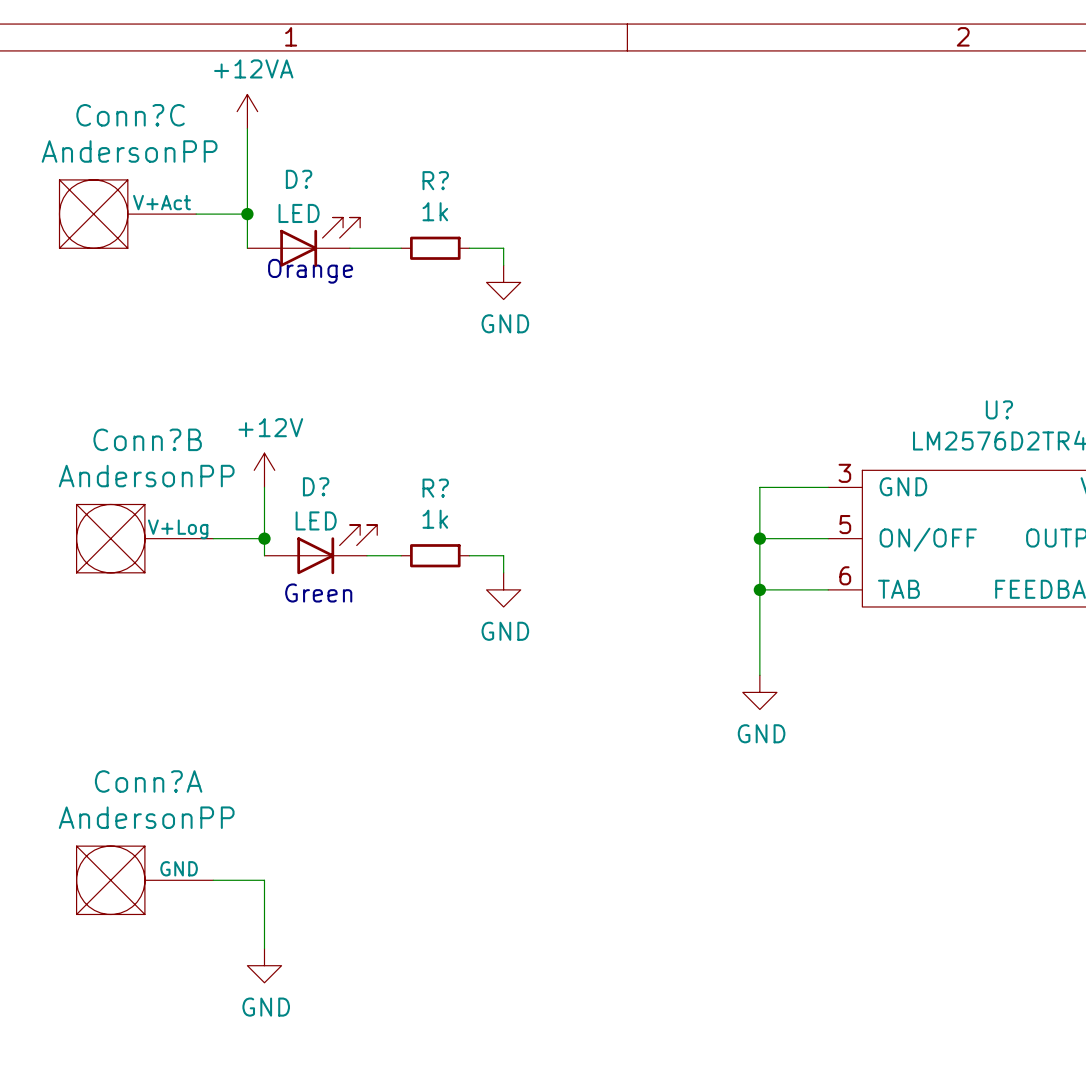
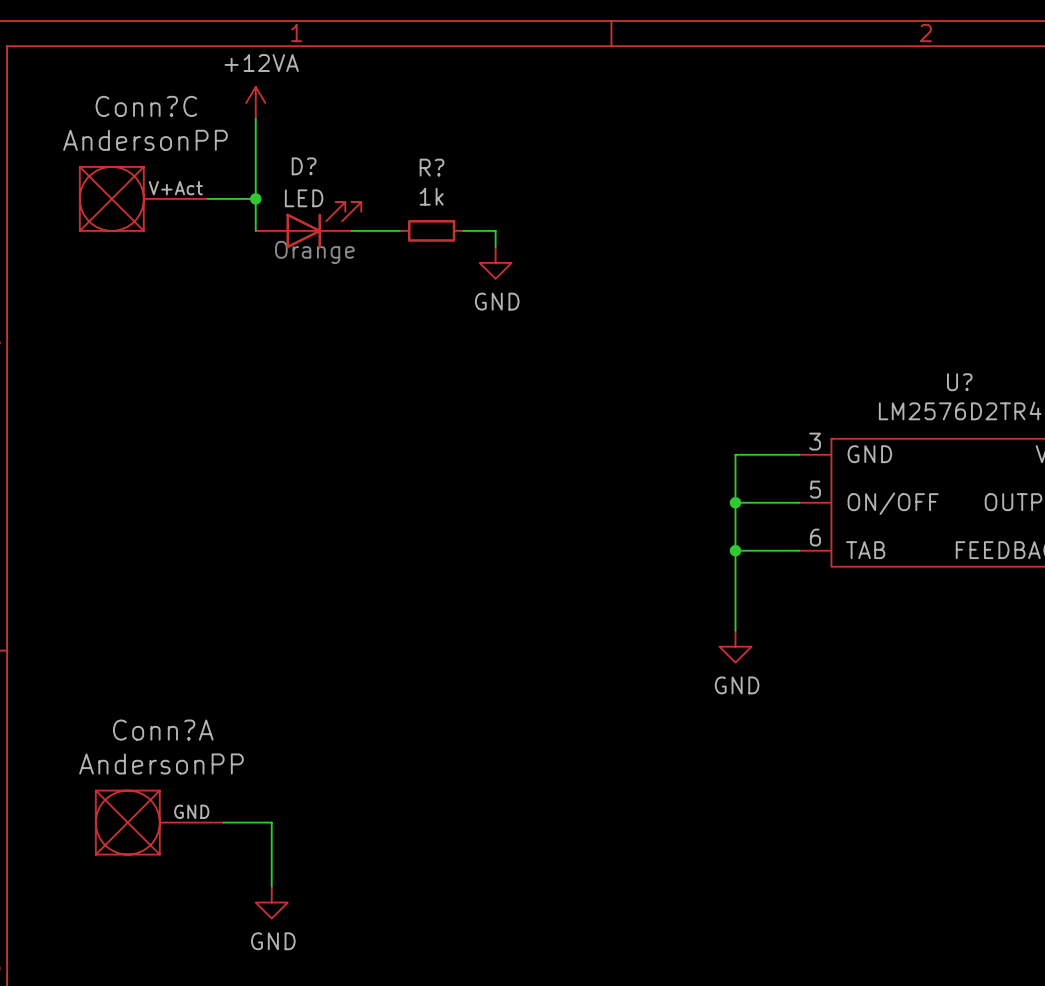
power symbol: +12V (264, 470) -> none
wire: (264, 487) (264, 555) -> none
Conn?B: AndersonPP (144, 538) -> none
wire: (213, 538) (264, 538) -> none
junction: (264, 538) -> none
D?: LED (320, 549) -> none
wire: (366, 555) (401, 555) -> none
R?: 1k (435, 555) -> none
wire: (469, 555) (503, 555) (503, 572) -> none
power symbol: GND (503, 589) -> none
text: Green (318, 592) -> none

